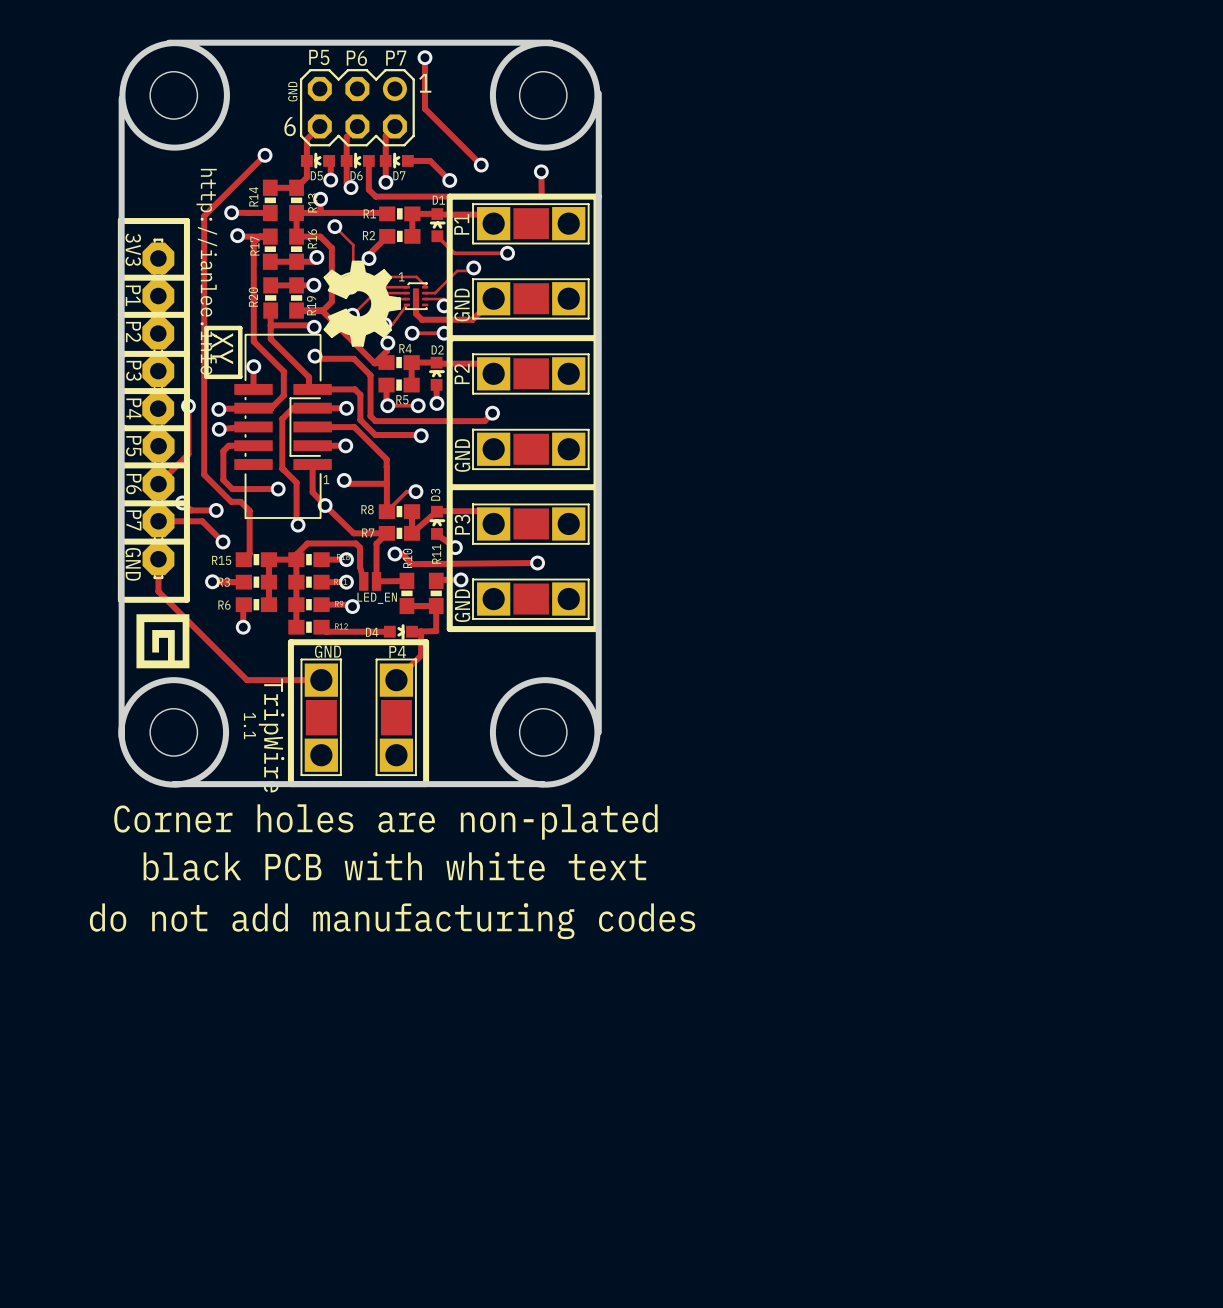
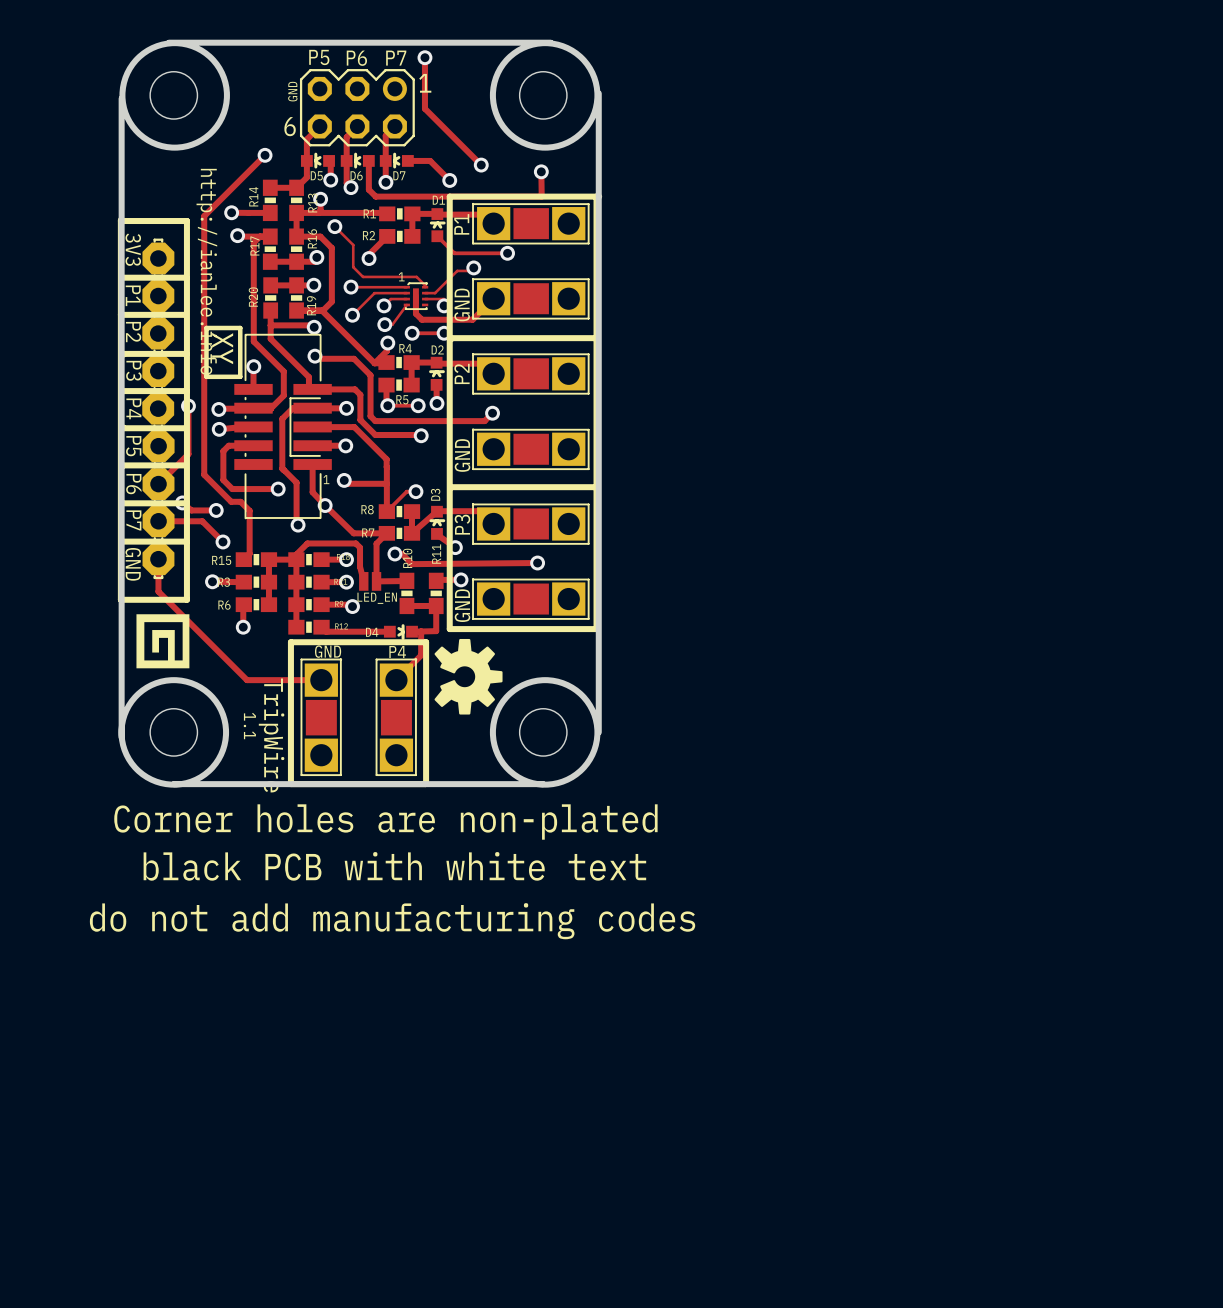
drawing: [323, 260, 401, 347] -> none
drawing: none -> [434, 638, 503, 715]

